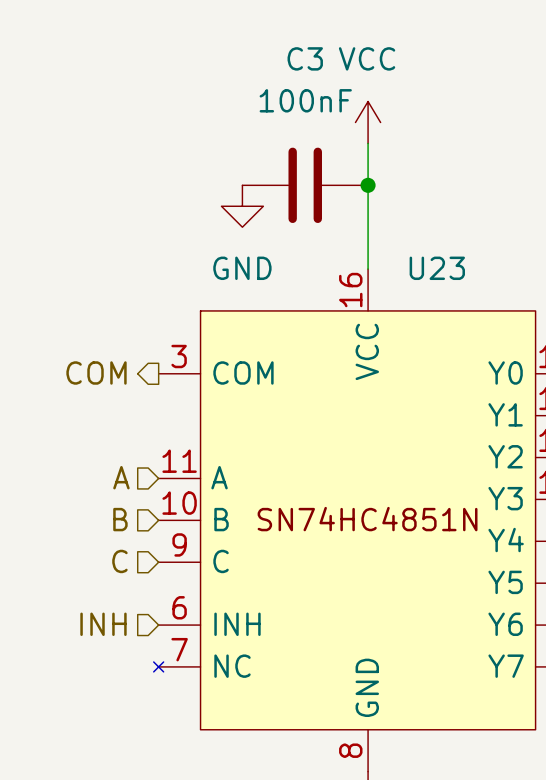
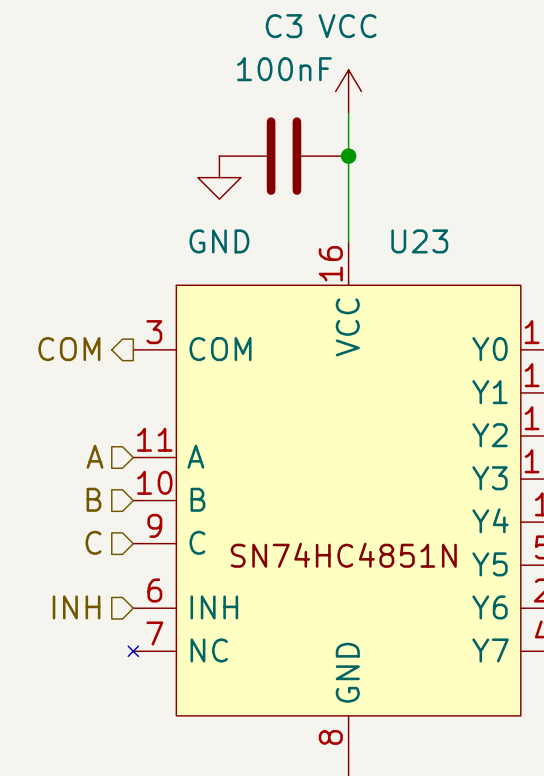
U23 text position: SN74HC4851N (367, 519) -> SN74HC4851N (343, 555)

